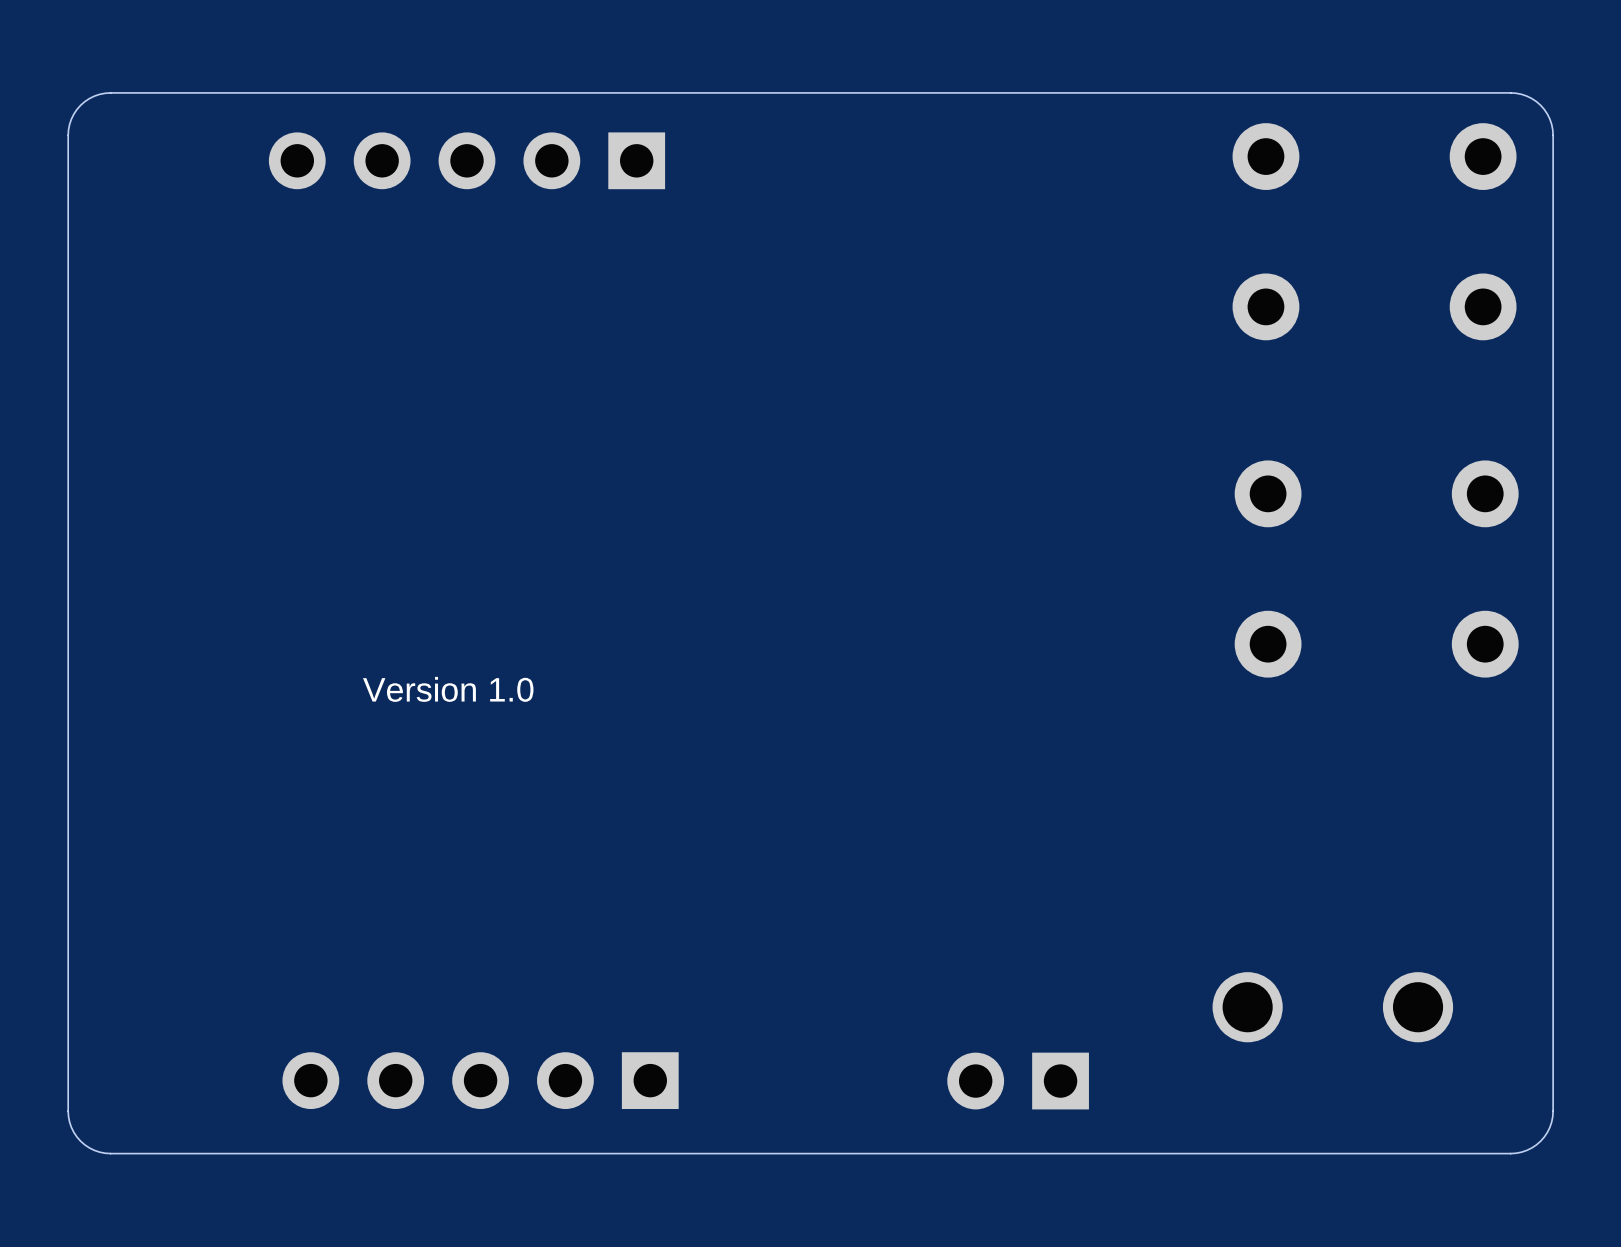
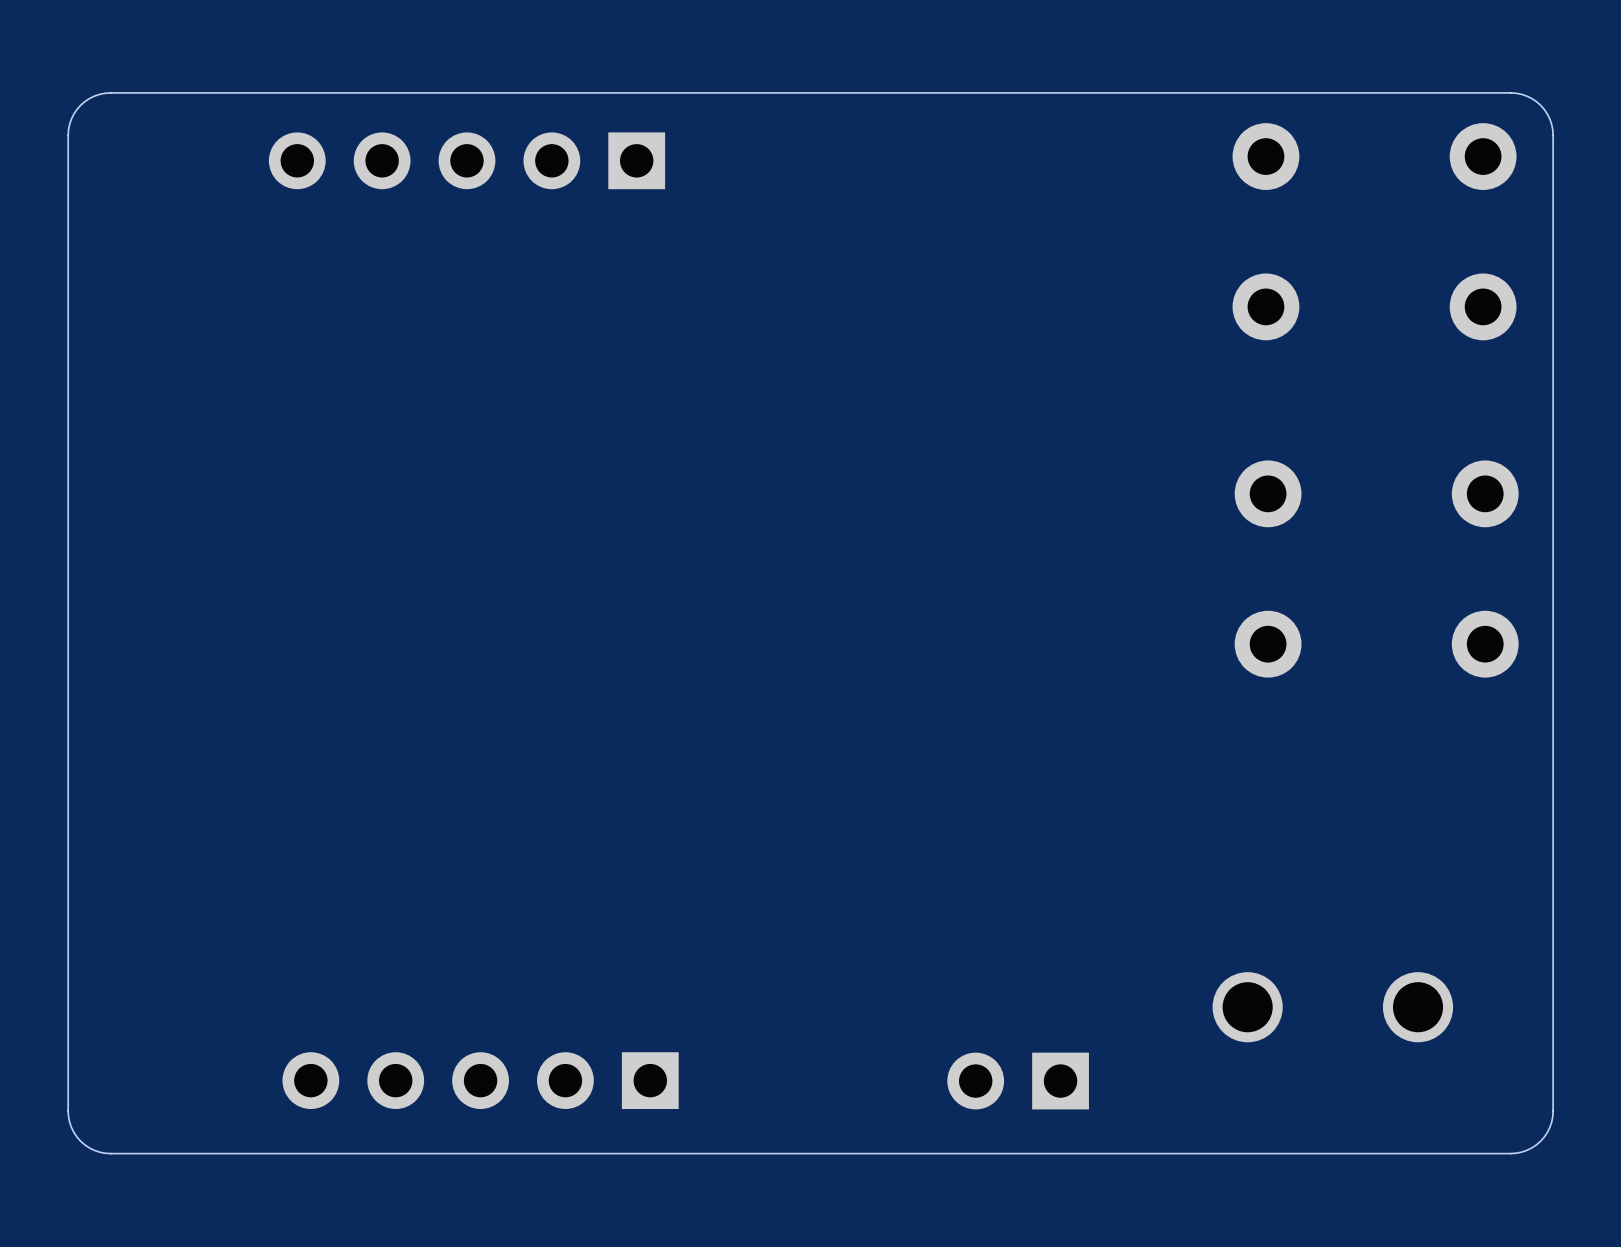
text: Version 1.0 (448, 689) -> none

